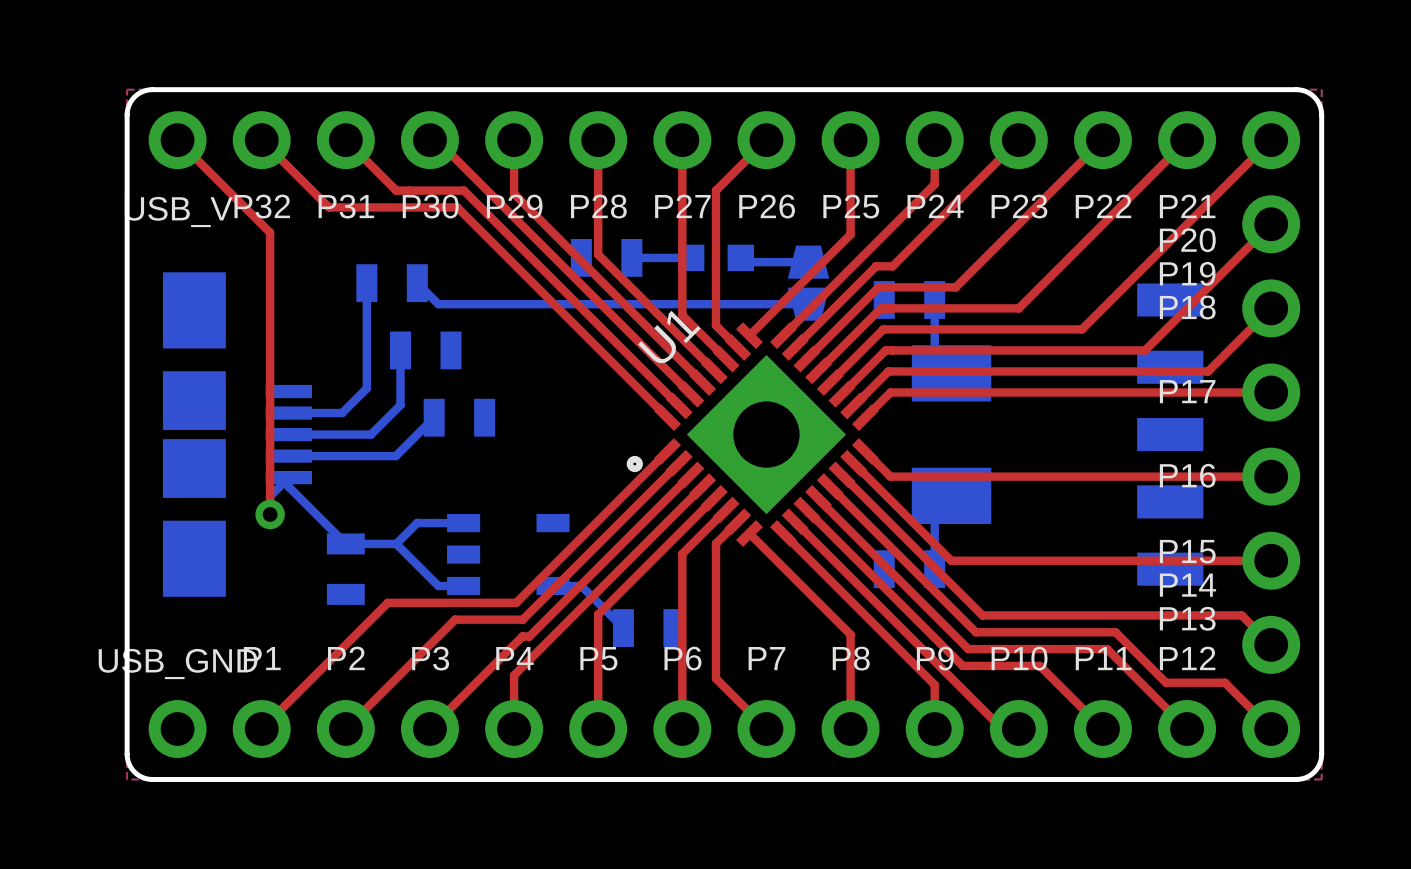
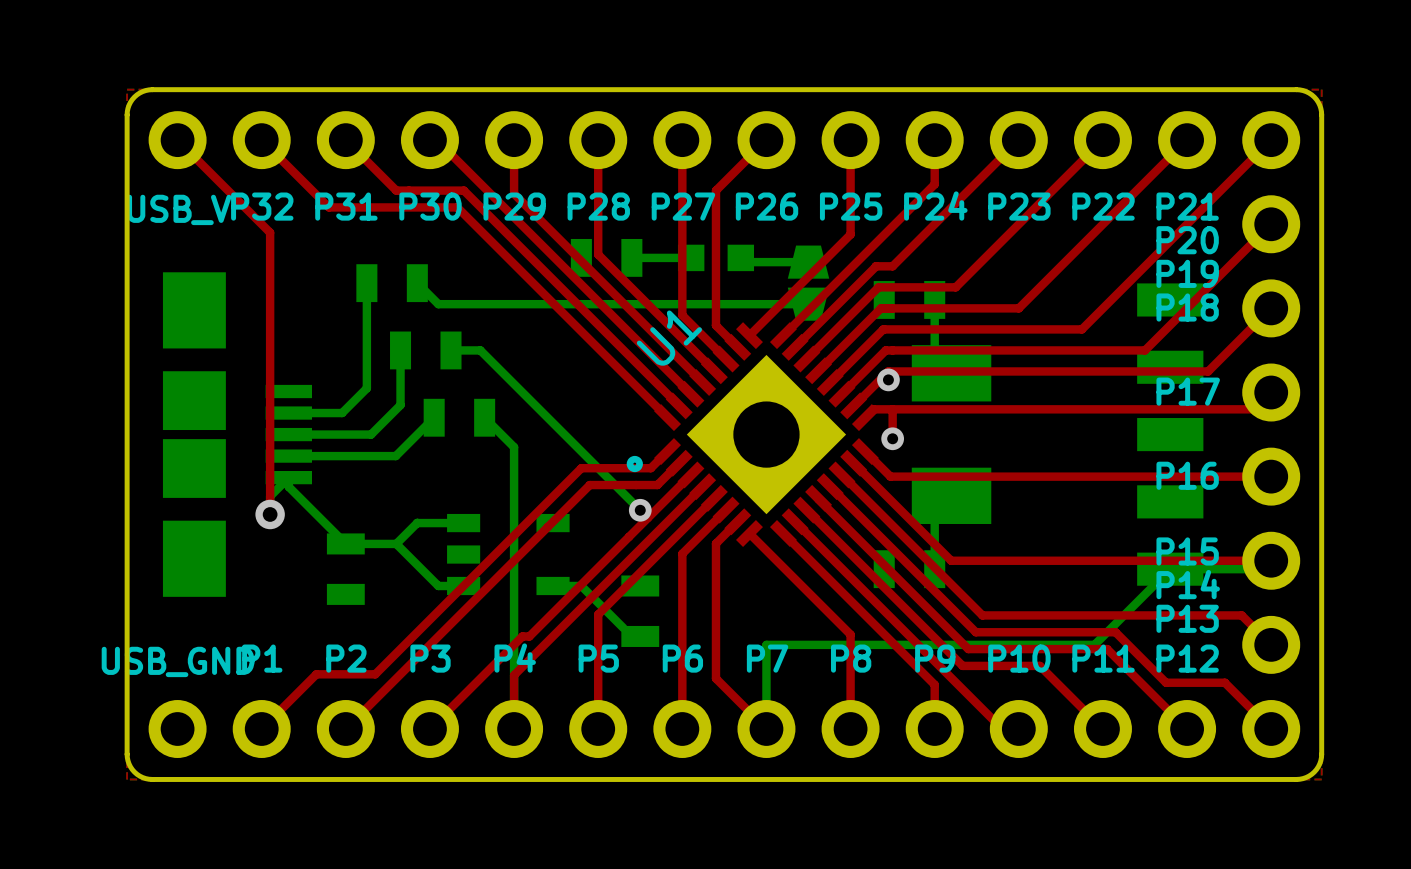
bottom track: none -> (451, 350) (480, 350) (640, 510)
via: none -> (888, 379)
top track: (1271, 392) (890, 392) (873, 409) -> (1271, 392) (1254, 409) (873, 409)
top track: none -> (892, 409) (892, 438)
bottom track: none -> (484, 417) (514, 447) (514, 729)
via: none -> (892, 438)
top track: (650, 468) (516, 602) (387, 602) (316, 674) -> (650, 468) (581, 468) (375, 674) (316, 674)
top track: (657, 485) (522, 619) (455, 619) -> (657, 485) (589, 485) (455, 619)
via: none -> (640, 510)
bottom track: none -> (1271, 560) (1262, 569) (1170, 569) (1094, 644) (766, 644) (766, 729)
part rotation: 0° (648, 628) -> 90° clockwise (640, 611)

